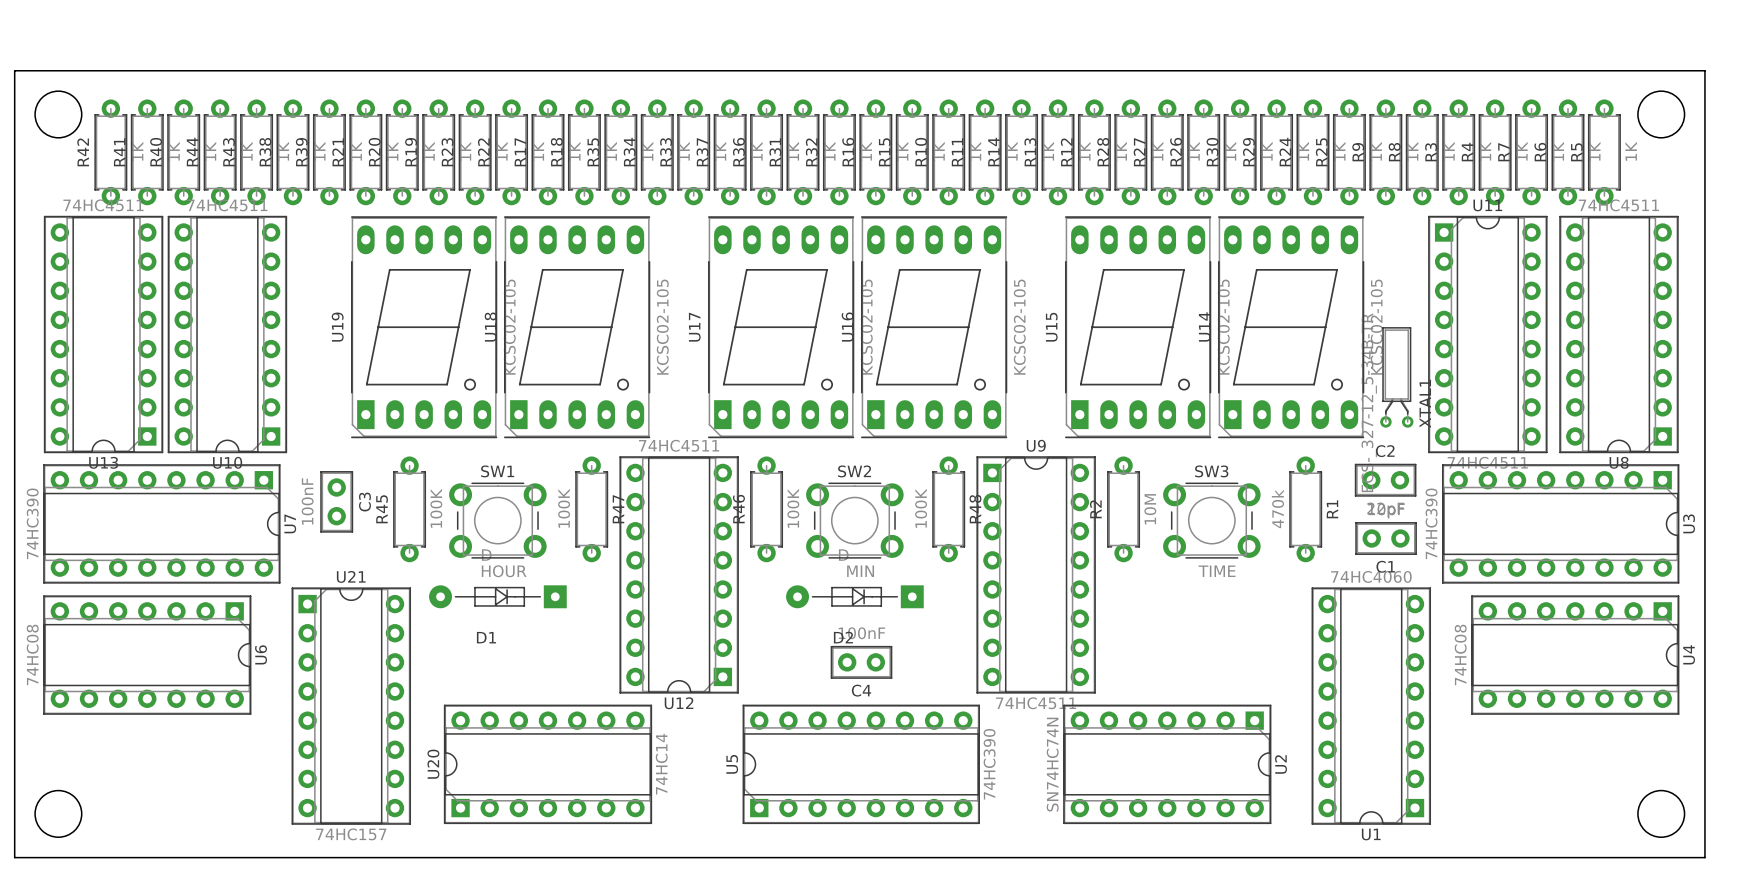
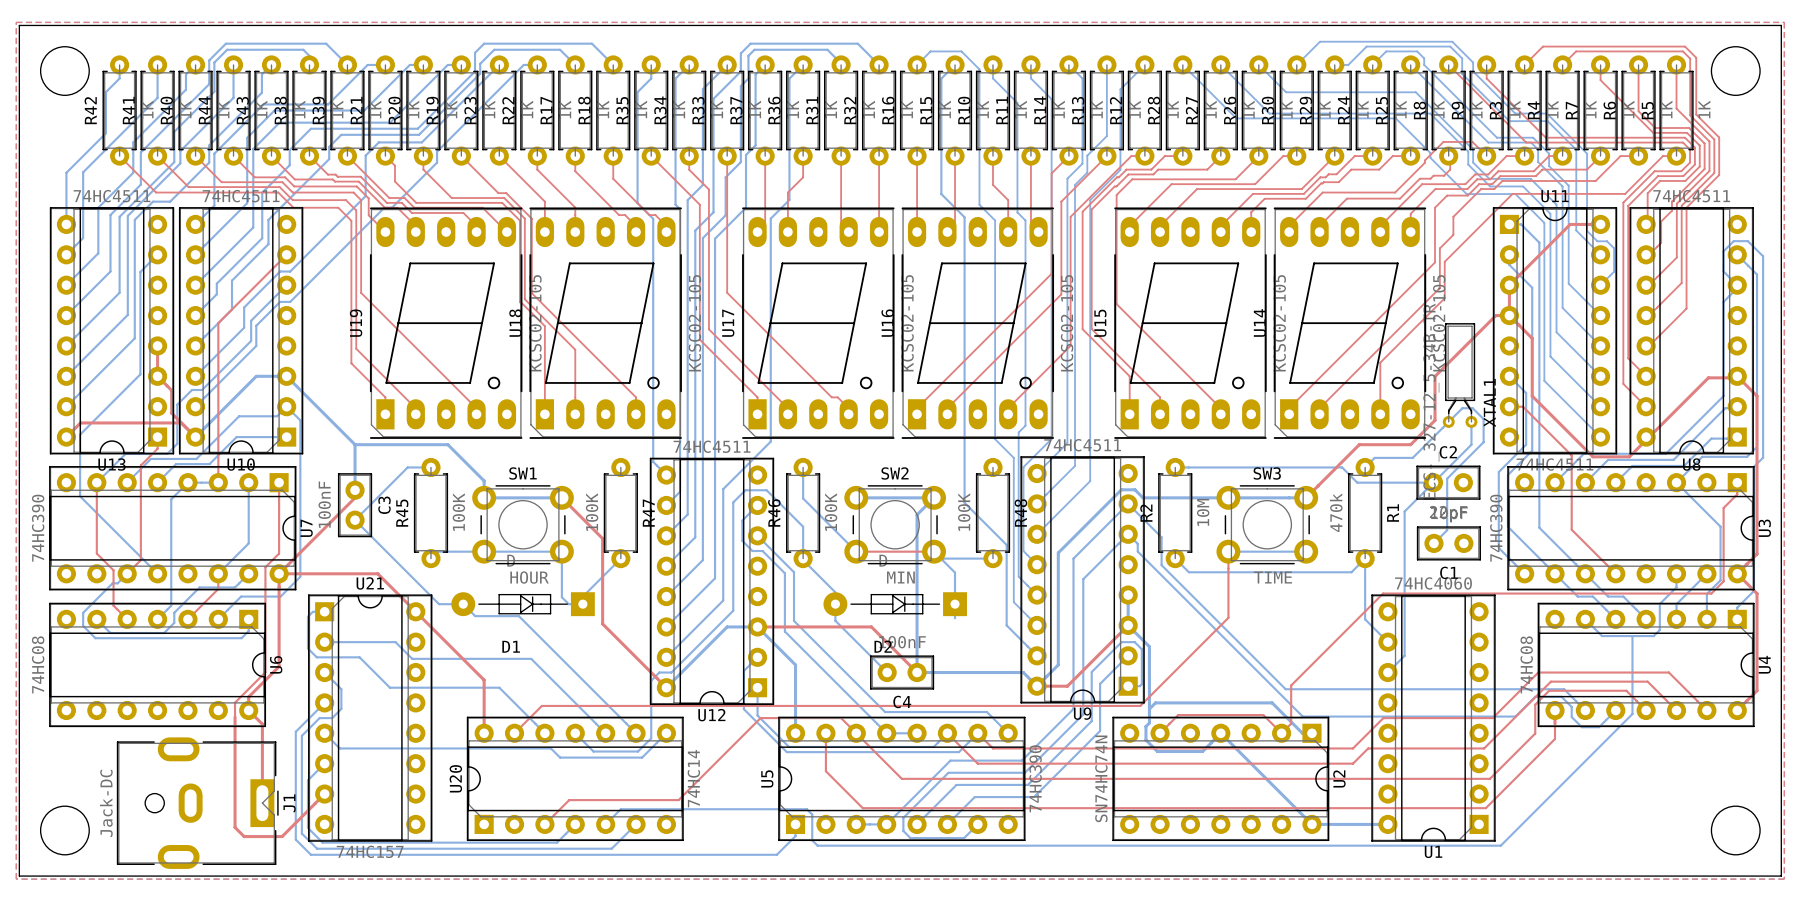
top zone outline: none -> (16, 22) (16, 879) (1784, 879) (1784, 22) (16, 22)
board edge: (14, 70) (1704, 70) -> (19, 55) (19, 25) (1781, 25) (1781, 55)
bottom track: none -> (119, 64) (119, 78) (105, 92) (105, 133) (66, 172) (66, 224)
bottom track: none -> (157, 64) (157, 97) (83, 172) (83, 238) (66, 254)
bottom track: none -> (195, 64) (185, 74) (185, 89) (133, 142) (133, 172) (98, 207) (98, 253) (66, 285)
bottom track: none -> (233, 64) (233, 97) (180, 151) (180, 163) (127, 215) (127, 314) (66, 376)
bottom track: none -> (271, 64) (261, 74) (261, 92) (209, 145) (209, 162) (170, 201) (153, 201) (134, 219) (134, 338) (66, 406)
bottom track: none -> (309, 64) (309, 55) (303, 49) (227, 49) (214, 62) (214, 91) (174, 131) (174, 162) (119, 216) (119, 292) (66, 345)
bottom track: none -> (347, 64) (326, 43) (225, 43) (209, 60) (209, 84) (140, 152) (140, 184) (110, 215) (110, 271) (66, 315)
bottom track: none -> (385, 64) (367, 64) (328, 104) (263, 104) (214, 153) (214, 205) (195, 224)
bottom track: none -> (423, 64) (409, 64) (364, 110) (274, 110) (247, 137) (247, 203) (195, 254)
bottom track: none -> (461, 64) (447, 64) (390, 122) (279, 122) (253, 149) (253, 227) (195, 285)
bottom track: none -> (499, 64) (421, 142) (378, 142) (365, 155) (365, 196) (290, 271) (280, 271) (244, 307) (244, 327) (195, 376)
bottom track: none -> (537, 64) (523, 64) (437, 151) (437, 162) (391, 207) (384, 207) (290, 301) (280, 301) (256, 325) (256, 345) (195, 406)
bottom track: none -> (575, 64) (560, 49) (494, 49) (480, 63) (480, 73) (419, 134) (341, 134) (329, 146) (329, 159) (268, 219) (268, 244) (232, 280) (232, 309) (195, 345)
bottom track: none -> (613, 64) (591, 43) (484, 43) (475, 52) (475, 71) (417, 128) (310, 128) (289, 150) (289, 165) (262, 192) (262, 238) (216, 283) (216, 294) (195, 315)
bottom track: none -> (651, 64) (651, 78) (637, 92) (637, 203) (653, 218) (653, 461) (666, 475)
bottom track: none -> (689, 64) (675, 78) (675, 204) (680, 209) (680, 491) (666, 505)
bottom track: none -> (727, 64) (702, 89) (702, 184) (687, 200) (687, 514) (666, 535)
bottom track: none -> (765, 64) (755, 74) (755, 145) (746, 154) (746, 207) (715, 238) (715, 578) (666, 626)
bottom track: none -> (803, 64) (789, 78) (789, 199) (770, 218) (770, 441) (723, 489) (723, 600) (666, 657)
bottom track: none -> (841, 64) (827, 49) (754, 49) (748, 55) (748, 78) (740, 86) (740, 162) (725, 177) (725, 215) (702, 238) (702, 560) (666, 596)
bottom track: none -> (879, 64) (857, 43) (750, 43) (740, 53) (740, 71) (713, 98) (713, 212) (695, 230) (695, 537) (666, 566)
bottom track: none -> (917, 64) (930, 51) (961, 51) (979, 69) (979, 204) (995, 220) (995, 439) (1013, 457) (1013, 602) (1037, 625)
bottom track: none -> (955, 64) (941, 78) (941, 194) (964, 217) (964, 502) (1006, 544) (1006, 625) (1037, 655)
bottom track: none -> (992, 64) (992, 78) (1017, 102) (1017, 212) (1025, 220) (1025, 425) (1018, 432) (1018, 576) (1037, 595)
bottom track: none -> (1030, 64) (1030, 78) (1051, 99) (1051, 438) (1023, 467) (1023, 551) (1037, 564)
bottom track: none -> (1068, 64) (1082, 78) (1082, 163) (1067, 178) (1067, 443) (1037, 473)
bottom track: none -> (1106, 64) (1106, 136) (1087, 155) (1087, 172) (1075, 184) (1075, 465) (1037, 503)
bottom track: none -> (1144, 64) (1120, 89) (1120, 169) (1090, 200) (1090, 481) (1037, 534)
bottom track: none -> (1182, 64) (1236, 118) (1395, 118) (1430, 153) (1430, 157) (1466, 194) (1515, 194) (1544, 222) (1544, 380) (1600, 437)
bottom track: none -> (1220, 64) (1269, 113) (1430, 113) (1468, 151) (1468, 164) (1490, 186) (1523, 186) (1550, 213) (1550, 356) (1600, 406)
bottom track: none -> (1258, 64) (1286, 92) (1415, 92) (1473, 149) (1473, 162) (1489, 178) (1530, 178) (1556, 204) (1556, 332) (1600, 376)
bottom track: none -> (1296, 64) (1320, 41) (1452, 41) (1473, 62) (1473, 71) (1515, 113) (1546, 113) (1587, 153) (1587, 230) (1597, 241) (1607, 241) (1614, 248) (1614, 271) (1600, 285)
bottom track: none -> (1334, 64) (1348, 64) (1366, 46) (1450, 46) (1462, 58) (1462, 73) (1509, 121) (1547, 121) (1576, 149) (1576, 230) (1600, 254)
bottom track: none -> (1372, 64) (1386, 51) (1417, 51) (1424, 58) (1424, 64) (1496, 137) (1533, 137) (1549, 153) (1549, 166) (1568, 185) (1568, 283) (1600, 315)
bottom track: none -> (1410, 64) (1488, 142) (1531, 142) (1538, 149) (1538, 162) (1562, 186) (1562, 307) (1600, 345)
top track: none -> (1448, 64) (1526, 142) (1683, 142) (1690, 149) (1690, 162) (1681, 171) (1654, 171) (1623, 202) (1623, 383) (1647, 408)
top track: none -> (1486, 64) (1486, 78) (1545, 137) (1685, 137) (1694, 147) (1694, 164) (1683, 176) (1657, 176) (1628, 205) (1628, 358) (1647, 377)
top track: none -> (1524, 64) (1543, 46) (1685, 46) (1696, 57) (1696, 114) (1719, 137) (1719, 175) (1686, 207) (1686, 308) (1647, 347)
top track: none -> (1562, 64) (1576, 51) (1683, 51) (1690, 58) (1690, 115) (1714, 139) (1714, 173) (1681, 205) (1681, 283) (1647, 317)
top track: none -> (1600, 64) (1600, 80) (1653, 132) (1687, 132) (1699, 145) (1699, 166) (1685, 180) (1660, 180) (1647, 193) (1647, 225)
top track: none -> (1638, 64) (1638, 111) (1655, 127) (1689, 127) (1704, 143) (1704, 168) (1671, 201) (1671, 210) (1661, 221) (1661, 242) (1647, 256)
top track: none -> (1676, 64) (1676, 108) (1709, 141) (1709, 171) (1676, 203) (1676, 257) (1647, 286)
round board edge position: (58, 114) -> (64, 71)
round board edge position: (1661, 114) -> (1735, 71)
R42 position: (110, 152) -> (119, 110)
R41 position: (147, 152) -> (157, 110)
R40 position: (183, 152) -> (195, 110)
R44 position: (220, 152) -> (233, 110)
R43 position: (256, 152) -> (271, 110)
R38 position: (293, 152) -> (309, 110)
R39 position: (329, 152) -> (347, 110)
R21 position: (365, 152) -> (385, 110)
R20 position: (402, 152) -> (423, 110)
R19 position: (438, 152) -> (461, 110)
R23 position: (475, 152) -> (499, 110)
R22 position: (511, 152) -> (537, 110)
R17 position: (547, 152) -> (575, 110)
R18 position: (584, 152) -> (613, 110)
R35 position: (620, 152) -> (651, 110)
R34 position: (657, 152) -> (689, 110)
R33 position: (693, 152) -> (727, 110)
R37 position: (730, 152) -> (765, 110)
R36 position: (766, 152) -> (803, 110)
R31 position: (802, 152) -> (841, 110)
R32 position: (839, 152) -> (879, 110)
R16 position: (875, 152) -> (917, 110)
R15 position: (912, 152) -> (955, 110)
R10 position: (948, 152) -> (992, 110)
R11 position: (985, 152) -> (1030, 110)
R14 position: (1021, 152) -> (1068, 110)
R13 position: (1057, 152) -> (1106, 110)
R12 position: (1094, 152) -> (1144, 110)
R28 position: (1130, 152) -> (1182, 110)
R27 position: (1167, 152) -> (1220, 110)
R26 position: (1203, 152) -> (1258, 110)
R30 position: (1240, 152) -> (1296, 110)
R29 position: (1276, 152) -> (1334, 110)
R24 position: (1312, 152) -> (1372, 110)
R25 position: (1349, 152) -> (1410, 110)
R9 position: (1385, 152) -> (1486, 110)
R8 position: (1422, 152) -> (1448, 110)
R3 position: (1458, 152) -> (1524, 110)
R4 position: (1495, 152) -> (1562, 110)
R7 position: (1531, 152) -> (1600, 110)
R6 position: (1567, 152) -> (1638, 110)
R5 position: (1604, 152) -> (1676, 110)
top track: none -> (119, 156) (156, 192) (278, 192) (293, 207) (338, 207) (351, 220) (351, 363) (385, 397) (385, 414)
top track: none -> (157, 156) (188, 187) (279, 187) (292, 200) (345, 200) (356, 210) (356, 348) (415, 408) (415, 414)
top track: none -> (195, 156) (221, 182) (282, 182) (292, 192) (353, 192) (361, 200) (361, 292) (476, 408) (476, 414)
top track: none -> (233, 156) (254, 177) (285, 177) (294, 186) (356, 186) (368, 198) (368, 215) (385, 232)
top track: none -> (271, 156) (294, 179) (358, 181) (384, 207) (397, 207) (415, 226) (415, 232)
top track: none -> (309, 156) (328, 174) (360, 176) (386, 202) (401, 202) (411, 212) (463, 212) (476, 226) (476, 232)
top track: none -> (347, 156) (389, 198) (404, 198) (414, 207) (482, 207) (506, 232)
top track: none -> (385, 156) (394, 165) (394, 181) (416, 202) (502, 202) (519, 220) (519, 302)
top track: none -> (423, 156) (423, 169) (451, 198) (504, 198) (524, 218) (524, 299) (575, 349) (575, 414)
top track: none -> (461, 156) (498, 193) (506, 193) (531, 218) (531, 293) (636, 397) (636, 414)
top track: none -> (499, 156) (544, 201) (544, 232)
top track: none -> (537, 156) (537, 169) (575, 207) (575, 232)
top track: none -> (575, 156) (575, 171) (619, 215) (625, 215) (636, 226) (636, 232)
top track: none -> (613, 156) (613, 178) (649, 215) (655, 215) (666, 226) (666, 232)
top track: none -> (651, 156) (699, 204) (699, 339) (757, 397) (757, 414)
top track: none -> (689, 156) (689, 169) (708, 189) (708, 329) (787, 408) (787, 414)
top track: none -> (727, 156) (727, 292) (831, 397) (837, 397) (848, 408) (848, 414)
top track: none -> (765, 156) (765, 224) (757, 232)
top track: none -> (803, 156) (803, 177) (787, 192) (787, 232)
top track: none -> (841, 156) (841, 224) (848, 232)
top track: none -> (879, 156) (879, 232)
top track: none -> (917, 156) (917, 232)
top track: none -> (955, 156) (955, 224) (947, 232)
top track: none -> (992, 156) (992, 184) (1008, 200) (1008, 232)
top track: none -> (1030, 156) (1030, 224) (1038, 232)
top track: none -> (1068, 156) (1051, 173) (1051, 273) (917, 408) (917, 414)
top track: none -> (1106, 156) (1061, 201) (1061, 294) (947, 408) (947, 414)
top track: none -> (1144, 156) (1131, 156) (1070, 216) (1070, 345) (1008, 408) (1008, 414)
top track: none -> (1182, 156) (1164, 156) (1151, 169) (1126, 169) (1082, 211) (1082, 329) (1129, 376) (1129, 414)
top track: none -> (1220, 156) (1207, 169) (1158, 169) (1153, 174) (1128, 174) (1091, 209) (1091, 329) (1160, 397) (1160, 414)
top track: none -> (1258, 156) (1235, 179) (1132, 179) (1116, 194) (1116, 304) (1220, 408) (1220, 414)
top track: none -> (1296, 156) (1283, 156) (1255, 184) (1171, 184) (1129, 226) (1129, 232)
top track: none -> (1334, 156) (1301, 189) (1197, 189) (1160, 226) (1160, 232)
top track: none -> (1372, 156) (1354, 156) (1336, 174) (1320, 177) (1303, 193) (1252, 193) (1220, 226) (1220, 232)
top track: none -> (1410, 156) (1392, 156) (1379, 169) (1351, 169) (1338, 182) (1321, 183) (1305, 198) (1264, 198) (1251, 212) (1251, 232)
top track: none -> (1450, 156) (1450, 169) (1444, 175) (1419, 178) (1400, 198) (1347, 198) (1319, 226) (1319, 232)
top track: none -> (1486, 156) (1472, 141) (1443, 141) (1395, 192) (1322, 192) (1289, 226) (1289, 232)
top track: none -> (1524, 156) (1506, 156) (1488, 174) (1475, 174) (1465, 184) (1422, 184) (1380, 226) (1380, 232)
top track: none -> (1562, 156) (1549, 156) (1533, 171) (1498, 171) (1490, 179) (1477, 179) (1467, 189) (1435, 189) (1410, 213) (1410, 232)
top track: none -> (1600, 156) (1587, 169) (1542, 169) (1535, 176) (1500, 176) (1492, 184) (1479, 184) (1467, 195) (1447, 195) (1435, 207) (1435, 262) (1289, 408) (1289, 414)
top track: none -> (1638, 156) (1620, 156) (1595, 180) (1502, 180) (1494, 189) (1481, 189) (1453, 216) (1453, 234) (1439, 248) (1439, 288) (1319, 408) (1319, 414)
top track: none -> (1676, 156) (1662, 156) (1625, 193) (1512, 193) (1444, 261) (1444, 298) (1380, 362) (1380, 414)
bottom track: none -> (1509, 224) (1521, 224) (1539, 242) (1539, 527) (1608, 596) (1623, 596) (1646, 619)
top track: none -> (1600, 224) (1570, 224) (1509, 285) (1509, 315)
bottom track: none -> (157, 254) (140, 271) (140, 374) (80, 434) (80, 496) (157, 573)
top track: none -> (286, 254) (218, 323) (218, 482)
bottom track: none -> (1509, 254) (1509, 264) (1532, 287) (1532, 450) (1507, 475) (1507, 526) (1577, 596) (1592, 596) (1615, 619)
bottom track: none -> (1738, 256) (1757, 274) (1757, 446) (1747, 456) (1702, 456) (1676, 482) (1720, 526) (1720, 580) (1706, 594) (1706, 619)
bottom track: none -> (286, 285) (251, 320) (251, 340) (202, 390) (192, 390) (177, 404) (177, 443) (167, 453) (125, 453) (96, 482)
top track: none -> (519, 301) (544, 326) (544, 414)
top track: none -> (1509, 315) (1495, 315) (1435, 376) (1435, 420) (1410, 444) (1359, 444) (1306, 497)
top track: none -> (1509, 315) (1532, 338) (1532, 396) (1592, 456) (1629, 456) (1708, 377) (1738, 377) (1757, 396) (1757, 554) (1737, 573) (1757, 593) (1757, 690) (1737, 710)
top track: none -> (157, 345) (157, 376) (171, 390) (171, 413) (195, 437)
bottom track: none -> (1509, 376) (1526, 393) (1526, 444) (1498, 472) (1498, 547) (1524, 573)
top track: none -> (1509, 406) (1522, 406) (1571, 455) (1571, 529) (1615, 573)
bottom track: none -> (1738, 408) (1725, 408) (1673, 459) (1608, 459) (1585, 482)
bottom track: none -> (1471, 421) (1471, 444) (1404, 511) (1404, 655) (1387, 672)
top track: none -> (181, 422) (80, 422) (66, 437)
top track: none -> (157, 437) (157, 448) (140, 465) (140, 560) (127, 573)
bottom track: none -> (195, 437) (256, 376) (286, 376) (355, 444)
bottom track: none -> (286, 437) (236, 437) (209, 464) (176, 464) (157, 482)
bottom track: none -> (1738, 438) (1711, 438) (1684, 465) (1632, 465) (1615, 482)
bottom track: none -> (355, 444) (355, 490)
bottom track: none -> (355, 444) (447, 444) (484, 480) (484, 497) (561, 497)
bottom track: none -> (430, 467) (407, 467) (355, 520) (439, 604) (463, 604) (475, 616) (518, 616) (636, 733)
bottom track: none -> (1175, 467) (1342, 467) (1357, 482) (1433, 482)
bottom track: none -> (1365, 467) (1374, 457) (1412, 457) (1462, 408) (1472, 408) (1483, 419) (1483, 442) (1447, 478) (1447, 530) (1433, 543)
bottom track: none -> (803, 468) (803, 498) (856, 551)
top track: none -> (96, 482) (96, 553) (113, 570) (113, 605) (127, 619)
bottom track: none -> (127, 482) (150, 458) (196, 458) (239, 416) (277, 416) (286, 406) (300, 420) (300, 576) (280, 596) (241, 596) (218, 619)
bottom track: none -> (218, 482) (187, 482) (171, 499) (171, 605) (157, 619)
bottom track: none -> (248, 482) (248, 543) (218, 573)
top track: none -> (279, 482) (279, 553) (265, 567) (265, 672) (235, 702) (235, 827) (244, 836) (282, 836) (324, 794)
bottom track: none -> (1555, 482) (1583, 453) (1665, 453) (1723, 396) (1723, 301) (1738, 286) (1723, 271) (1723, 251) (1733, 241) (1747, 241) (1763, 256) (1763, 457) (1753, 466) (1753, 590) (1737, 607) (1737, 619)
top track: none -> (1737, 482) (1737, 494) (1723, 508) (1723, 581) (1711, 593) (1383, 593) (1291, 685) (1291, 723) (1281, 733) (1263, 715) (1178, 715) (1160, 733)
top track: none -> (355, 490) (355, 497) (279, 573)
top track: none -> (561, 497) (602, 538) (602, 623) (666, 687)
bottom track: none -> (856, 497) (934, 497) (917, 514) (917, 672) (1023, 672) (1037, 686) (1058, 664) (1058, 552) (1121, 489) (1134, 489) (1143, 497) (1306, 497)
bottom track: none -> (757, 505) (742, 520) (742, 540) (752, 551) (762, 551) (784, 573) (784, 631) (886, 733) (917, 733)
bottom track: none -> (757, 535) (794, 572) (794, 620) (885, 712) (986, 712) (1008, 733)
top track: none -> (856, 551) (934, 551)
bottom track: none -> (934, 551) (955, 572) (955, 618)
bottom track: none -> (1228, 551) (1306, 551)
top track: none -> (1228, 551) (1228, 617) (1140, 705) (541, 705) (514, 733)
bottom track: none -> (430, 558) (437, 551) (561, 551) (561, 597) (568, 604) (582, 604) (582, 596) (620, 558)
bottom track: none -> (940, 558) (992, 558)
bottom track: none -> (1175, 558) (1188, 572) (1351, 572) (1365, 558) (1365, 619) (1387, 642)
bottom track: none -> (127, 573) (117, 583) (112, 583) (83, 612) (83, 625) (95, 638) (241, 638) (248, 631) (248, 619)
top track: none -> (218, 573) (218, 588) (187, 619)
bottom track: none -> (248, 573) (235, 587) (199, 587) (174, 612) (174, 622) (164, 633) (110, 633) (96, 619)
top track: none -> (279, 573) (279, 666) (248, 696) (248, 710) (262, 724) (262, 803)
top track: none -> (279, 573) (377, 573) (484, 680) (484, 733)
bottom track: none -> (1676, 573) (1676, 587) (1659, 604) (1659, 629) (1653, 636) (1602, 636) (1585, 619)
bottom track: none -> (1706, 573) (1676, 604) (1676, 619)
U9 rotation: 0° (1036, 574) -> 180° (1082, 579)
bottom track: none -> (1128, 595) (1128, 625) (1149, 646) (1149, 723) (1145, 726) (1145, 740) (1157, 751) (1202, 751) (1220, 733) (1311, 824) (1387, 824)
bottom track: none -> (324, 611) (312, 611) (307, 616) (307, 648) (316, 657) (359, 657) (389, 687) (499, 687) (544, 733)
top track: none -> (1128, 625) (1067, 686) (1037, 686)
top track: none -> (757, 626) (871, 626) (917, 672)
bottom track: none -> (1632, 636) (1632, 714) (1500, 845) (817, 845) (812, 840) (812, 814) (806, 809) (620, 809) (605, 824)
bottom track: none -> (324, 642) (395, 642) (412, 658) (531, 658) (605, 733)
bottom track: none -> (1128, 655) (1100, 683) (1100, 731) (1034, 797) (974, 797) (947, 824)
bottom track: none -> (757, 657) (743, 671) (743, 709) (786, 752) (958, 752) (977, 733)
bottom track: none -> (324, 672) (341, 689) (341, 708) (332, 718) (319, 718) (301, 735) (301, 833) (317, 848) (611, 848) (636, 824)
bottom track: none -> (887, 672) (835, 620) (835, 592) (803, 560) (803, 526) (766, 490) (745, 490) (733, 502) (733, 610) (671, 672) (659, 672) (651, 680) (651, 738) (638, 751) (593, 751) (575, 733)
bottom track: none -> (1128, 686) (1139, 686) (1141, 684) (1141, 649) (1134, 642) (1121, 642) (1091, 672) (1091, 721) (1027, 784) (956, 784) (917, 824)
bottom track: none -> (666, 687) (727, 626) (757, 626) (795, 664) (795, 733)
bottom track: none -> (757, 687) (757, 715) (788, 746) (933, 746) (947, 733)
bottom track: none -> (324, 702) (295, 731) (295, 839) (310, 854) (776, 854) (795, 836) (795, 824)
bottom track: none -> (1149, 708) (1155, 702) (1272, 702) (1302, 733) (1311, 733)
top track: none -> (1555, 710) (1555, 739) (1485, 808) (862, 808) (825, 771) (825, 733)
bottom track: none -> (1585, 710) (1564, 689) (1285, 689) (1161, 565) (1161, 537) (1128, 503) (1073, 558) (1073, 708) (1021, 760) (950, 760) (886, 824) (856, 824)
bottom track: none -> (1615, 710) (1599, 727) (1581, 727) (1571, 717) (1571, 706) (1561, 696) (1535, 696) (1515, 716) (1302, 716) (1137, 551) (1137, 543) (1128, 534) (1083, 579) (1083, 714) (1024, 772) (948, 772) (903, 817) (903, 830) (910, 838) (964, 838) (977, 824)
top track: none -> (1646, 710) (1626, 690) (1549, 690) (1535, 704) (1535, 733) (1489, 778) (901, 778) (841, 718) (760, 718) (678, 800) (569, 800) (544, 824)
top track: none -> (1676, 710) (1647, 681) (1550, 681) (1484, 748) (1368, 748) (1352, 763) (977, 763) (947, 733)
top track: none -> (1706, 710) (1668, 672) (1538, 672) (1492, 718) (1383, 718) (1352, 748) (992, 748) (977, 733)
bottom track: none -> (324, 733) (339, 748) (550, 748) (560, 757) (642, 757) (666, 733)
bottom track: none -> (324, 763) (307, 780) (307, 827) (322, 842) (557, 842) (575, 824)
J1: none -> Jack-DC (197, 803)

